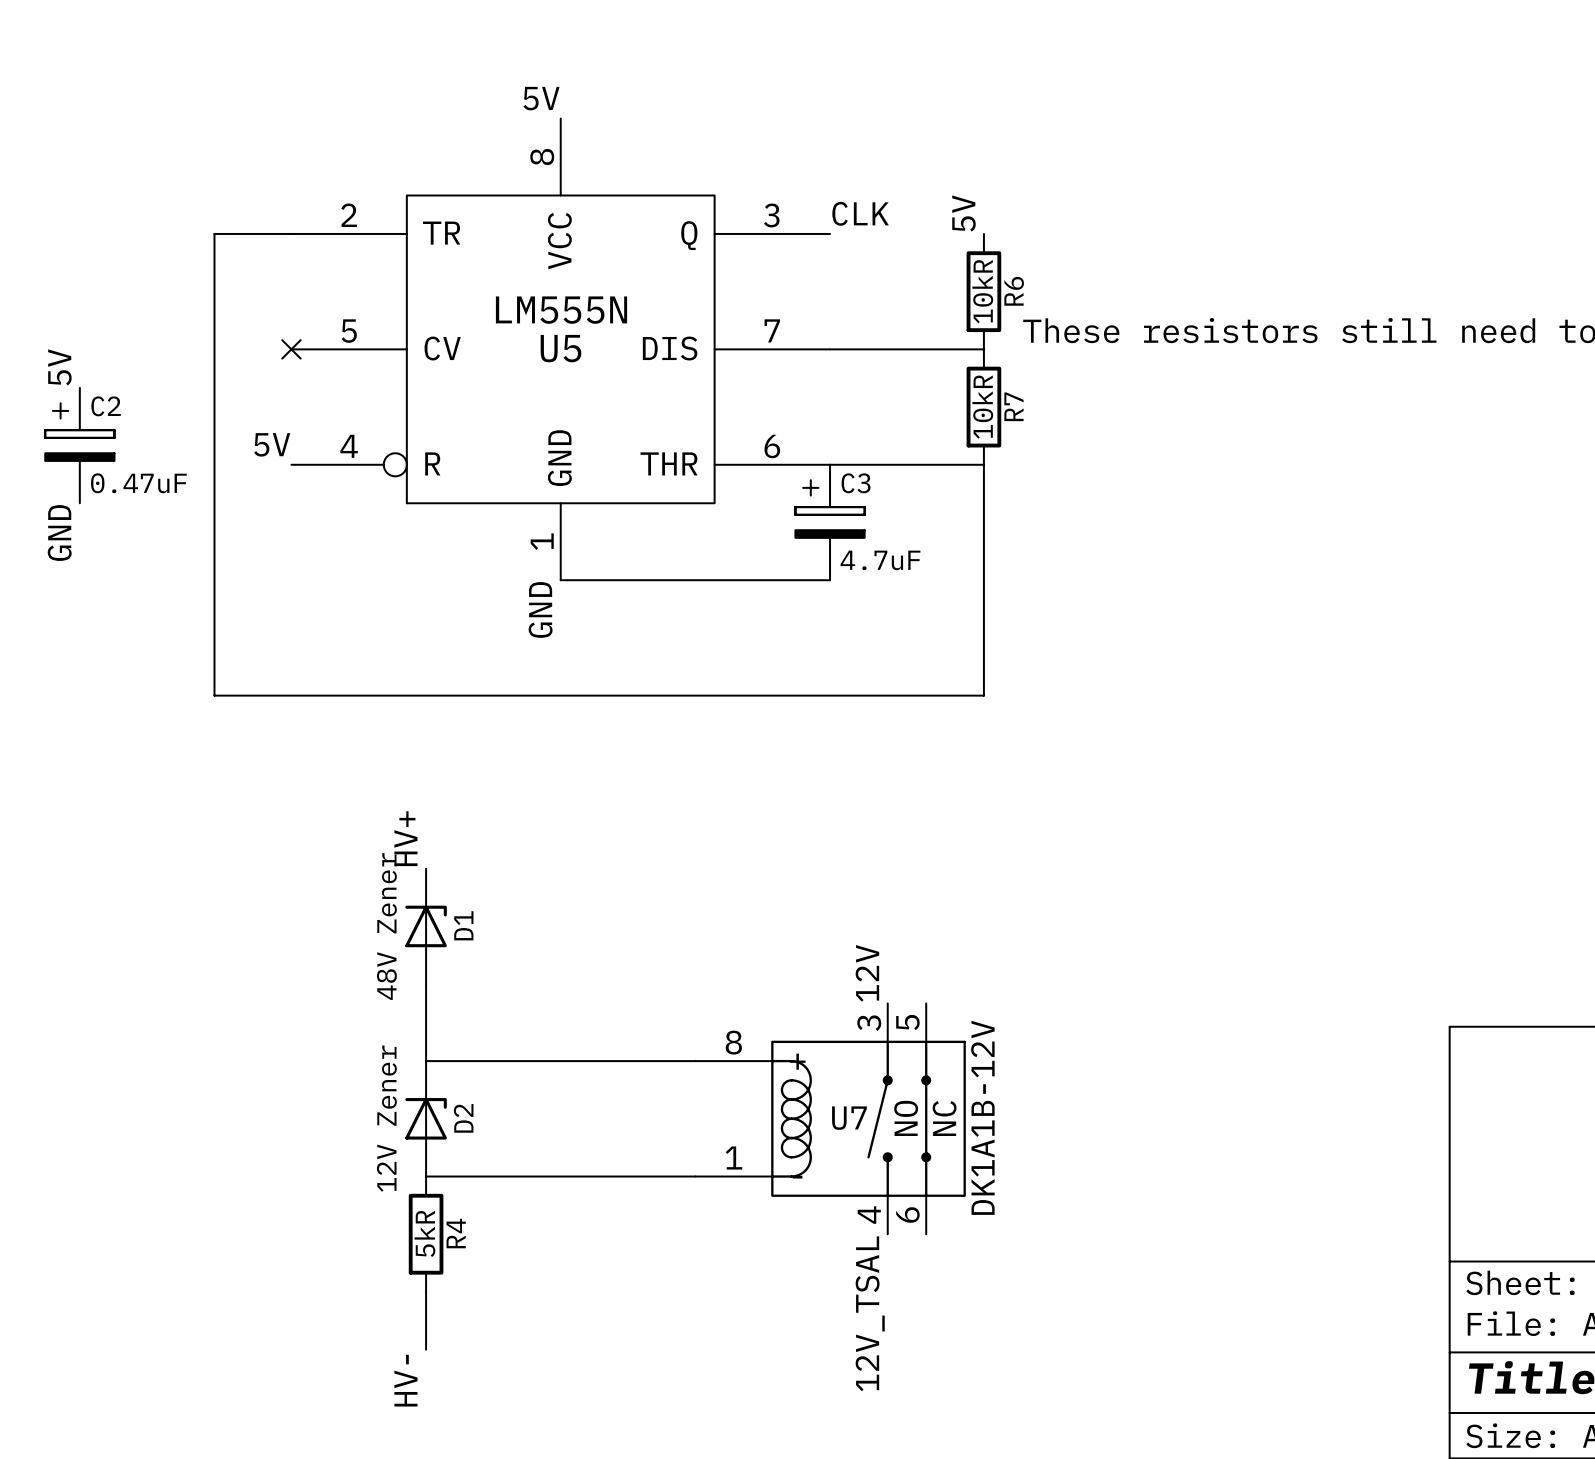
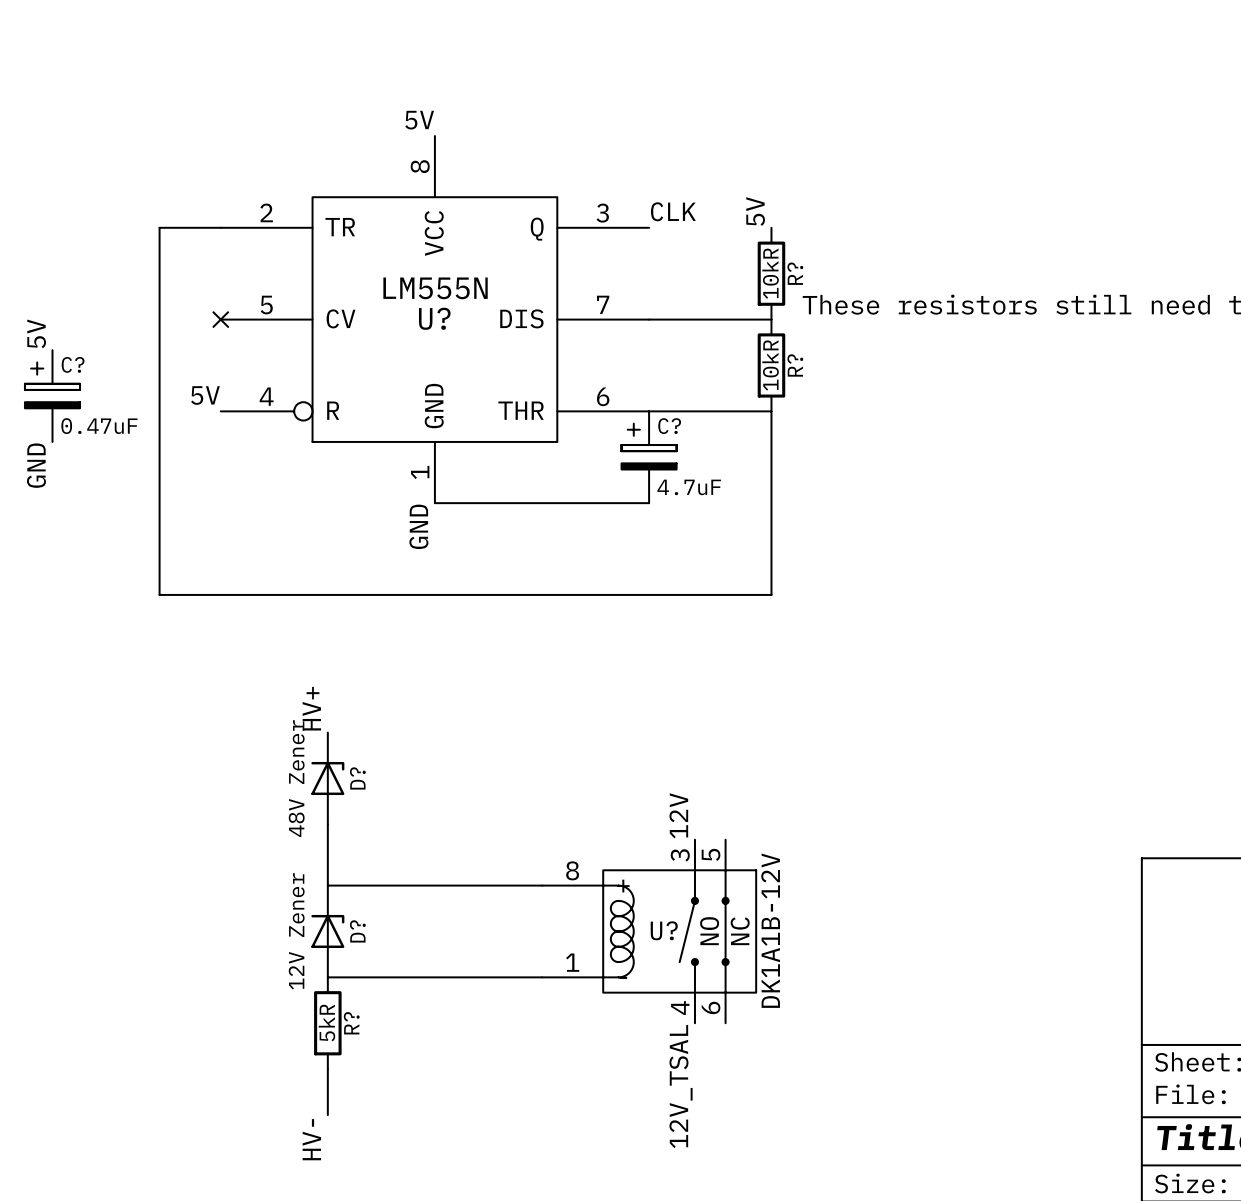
R6 name: R6 (1014, 291) -> R? (795, 273)
U5 name: U5 (560, 348) -> U? (434, 318)
C2 name: C2 (106, 406) -> C? (73, 364)
R7 name: R7 (1013, 406) -> R? (795, 365)
C3 name: C3 (856, 483) -> C? (669, 426)
D1 name: D1 (463, 925) -> D? (357, 778)
D2 name: D2 (463, 1118) -> D? (357, 931)
U7 name: U7 (849, 1118) -> U? (664, 930)
R4 name: R4 (456, 1233) -> R? (351, 1023)

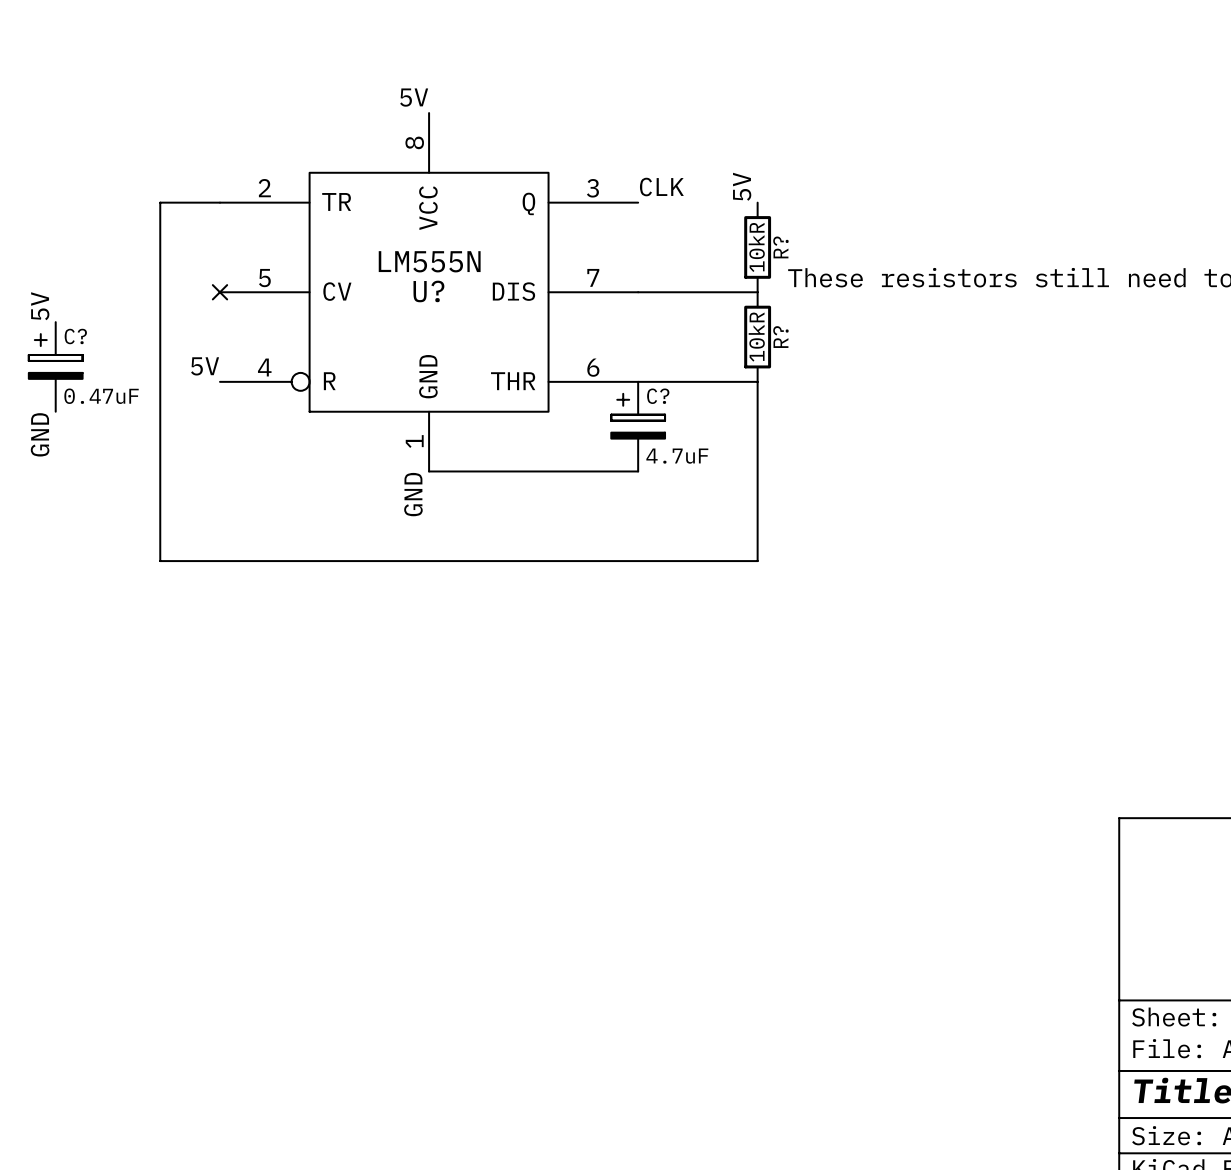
label: HV+ (311, 708) -> none
D?: 48V Zener (327, 778) -> none
label: 12V (678, 815) -> none
wire: (327, 824) (327, 885) (542, 885) -> none
D?: 12V Zener (327, 931) -> none
U?: DK1A1B-12V (649, 931) -> none
wire: (327, 977) (542, 977) -> none
R?: 5kR (327, 1023) -> none
wire: (327, 1069) (327, 1115) -> none
label: 12V_TSAL (681, 1086) -> none
label: HV- (311, 1139) -> none

